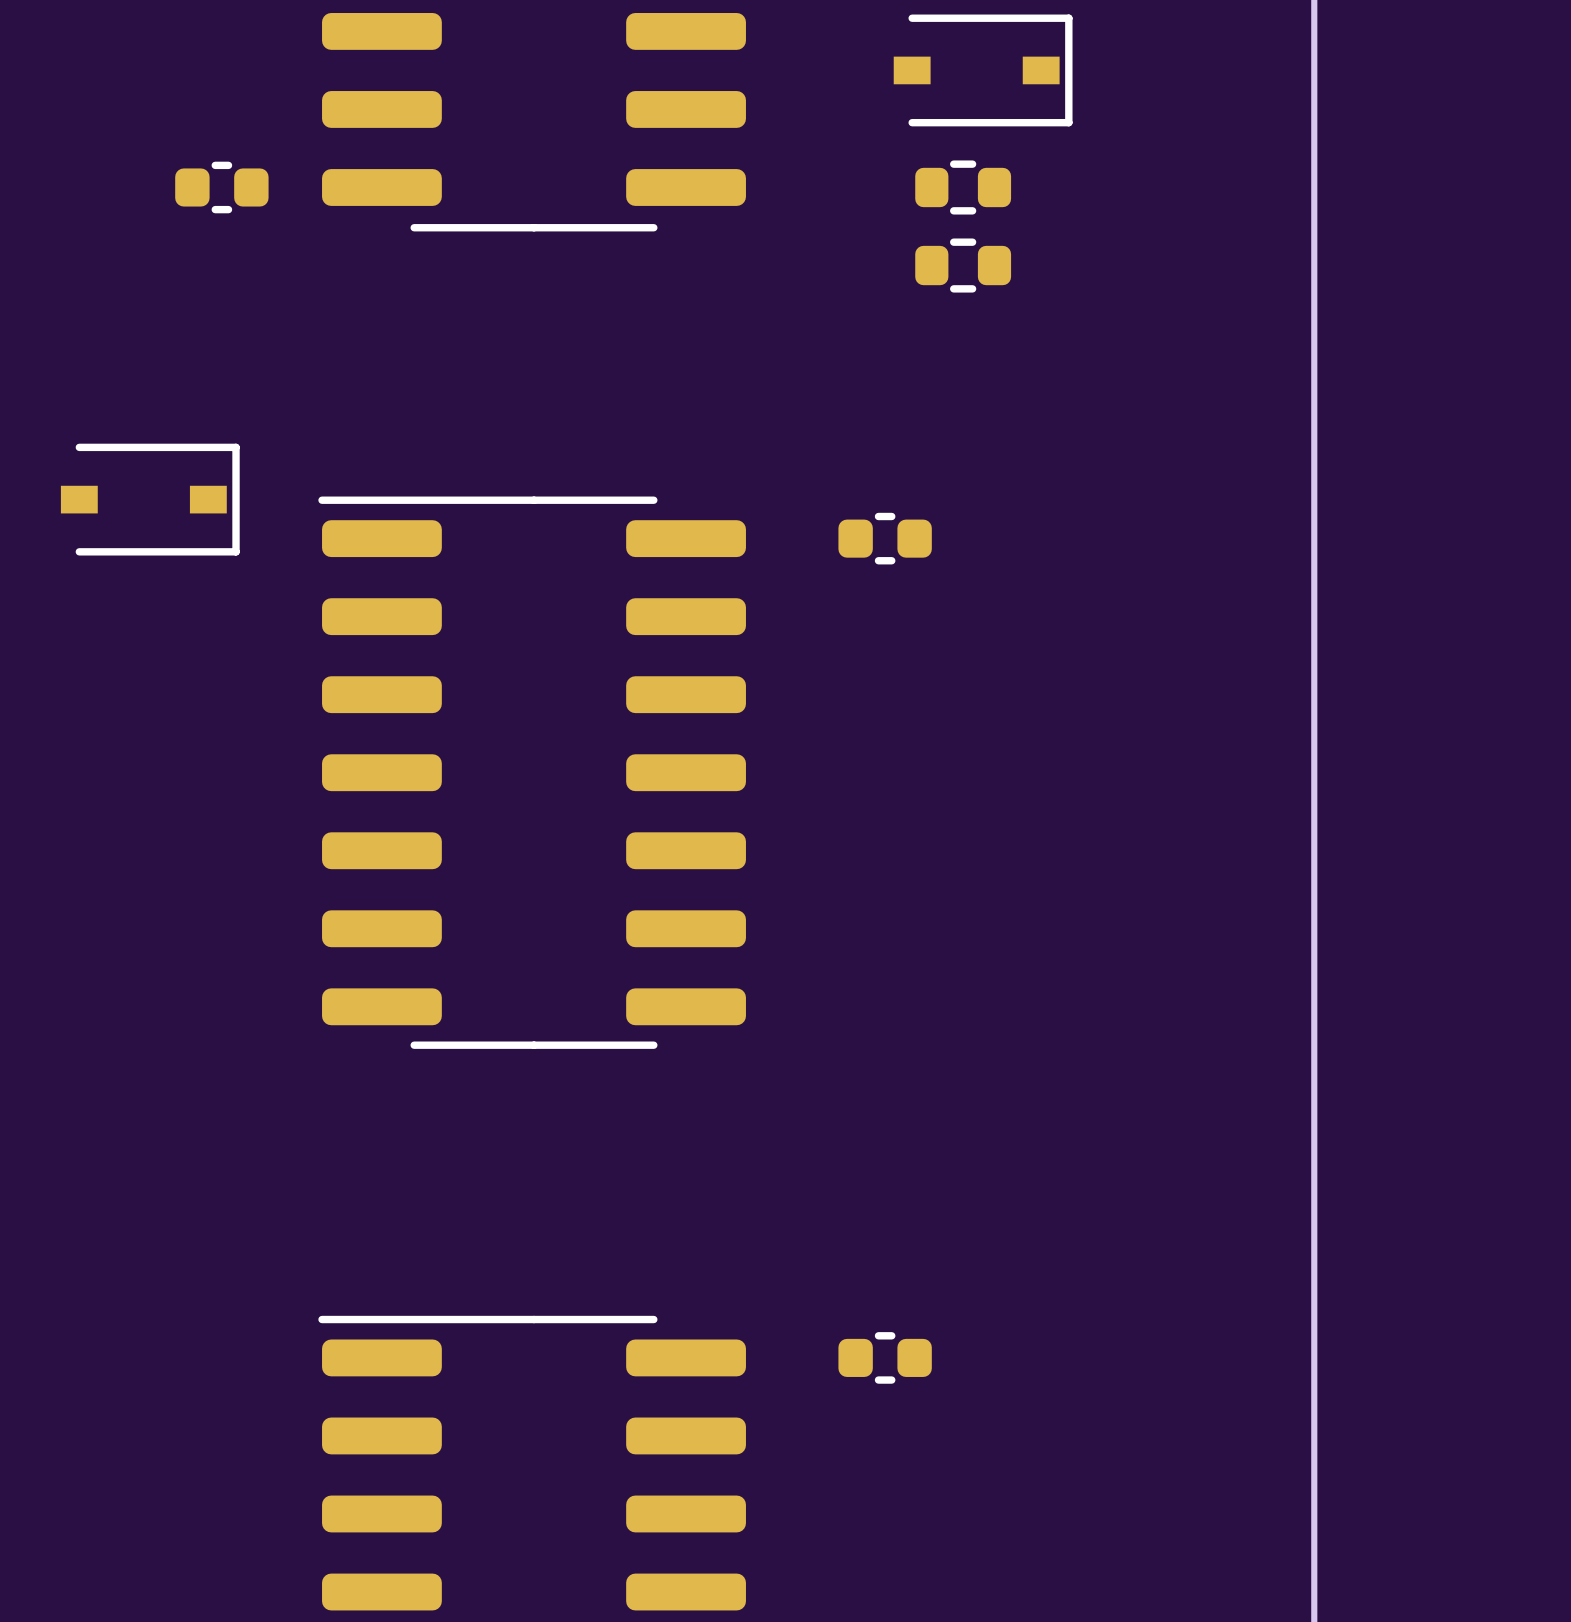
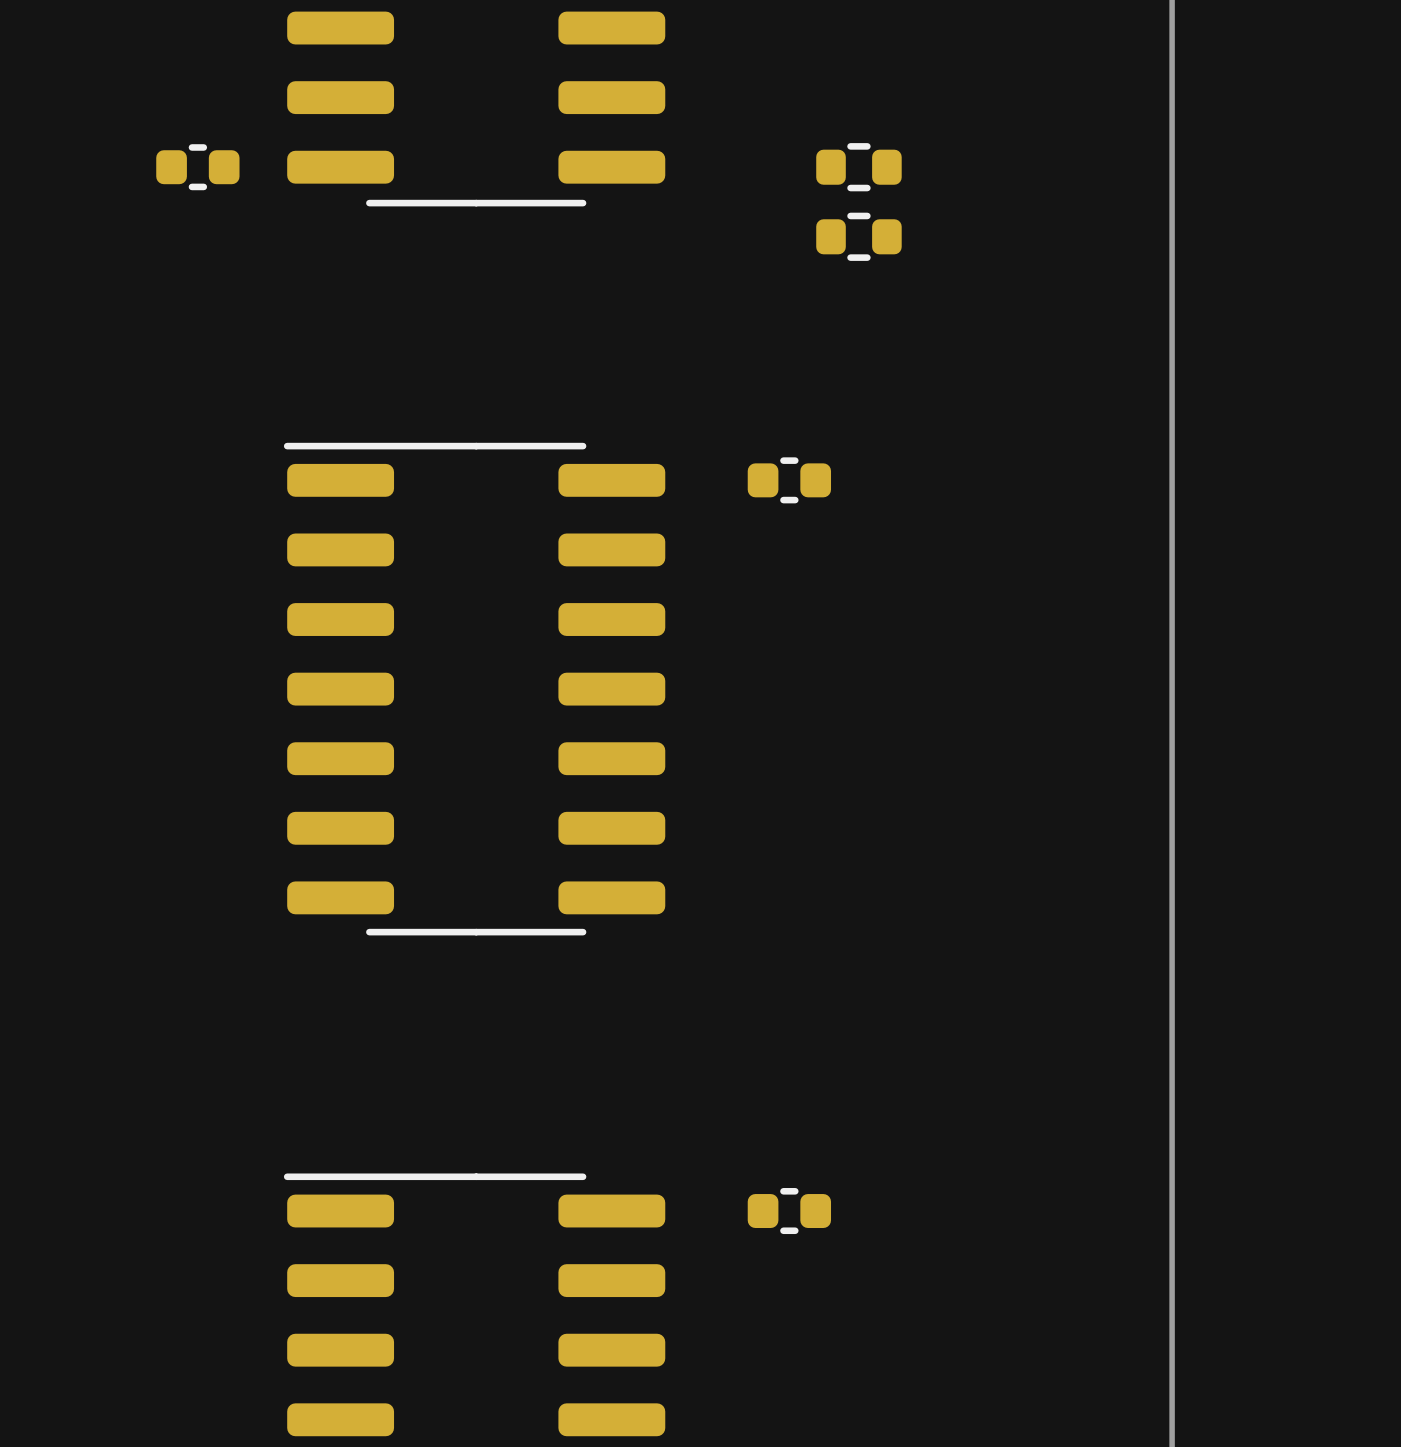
part: (983, 70) -> none
part: (150, 499) -> none

